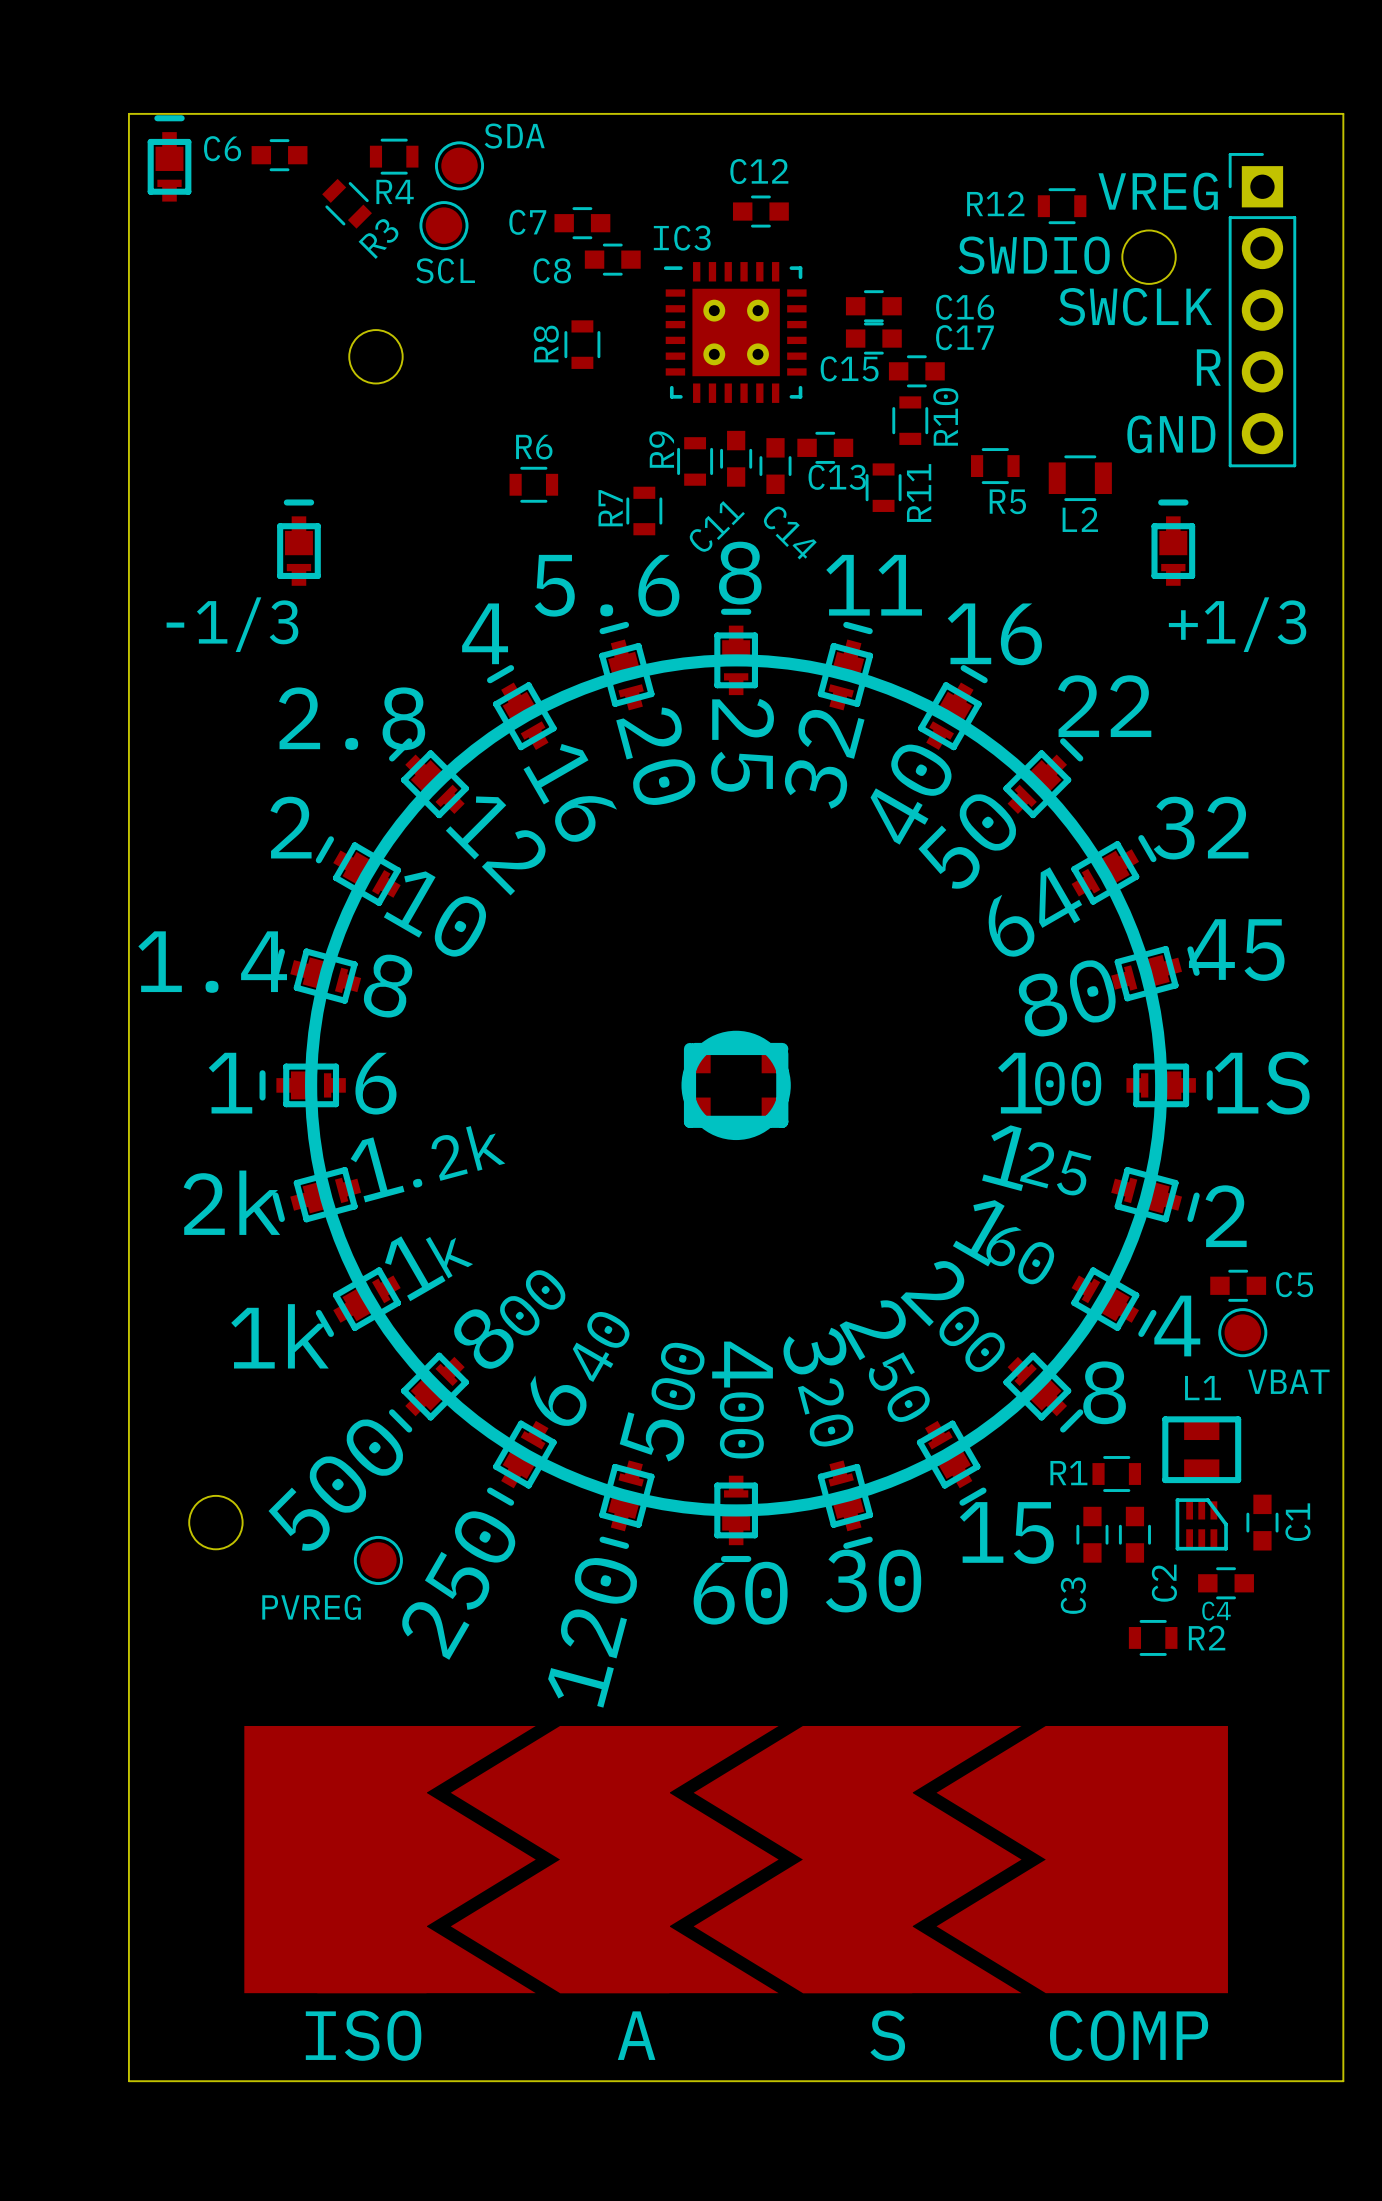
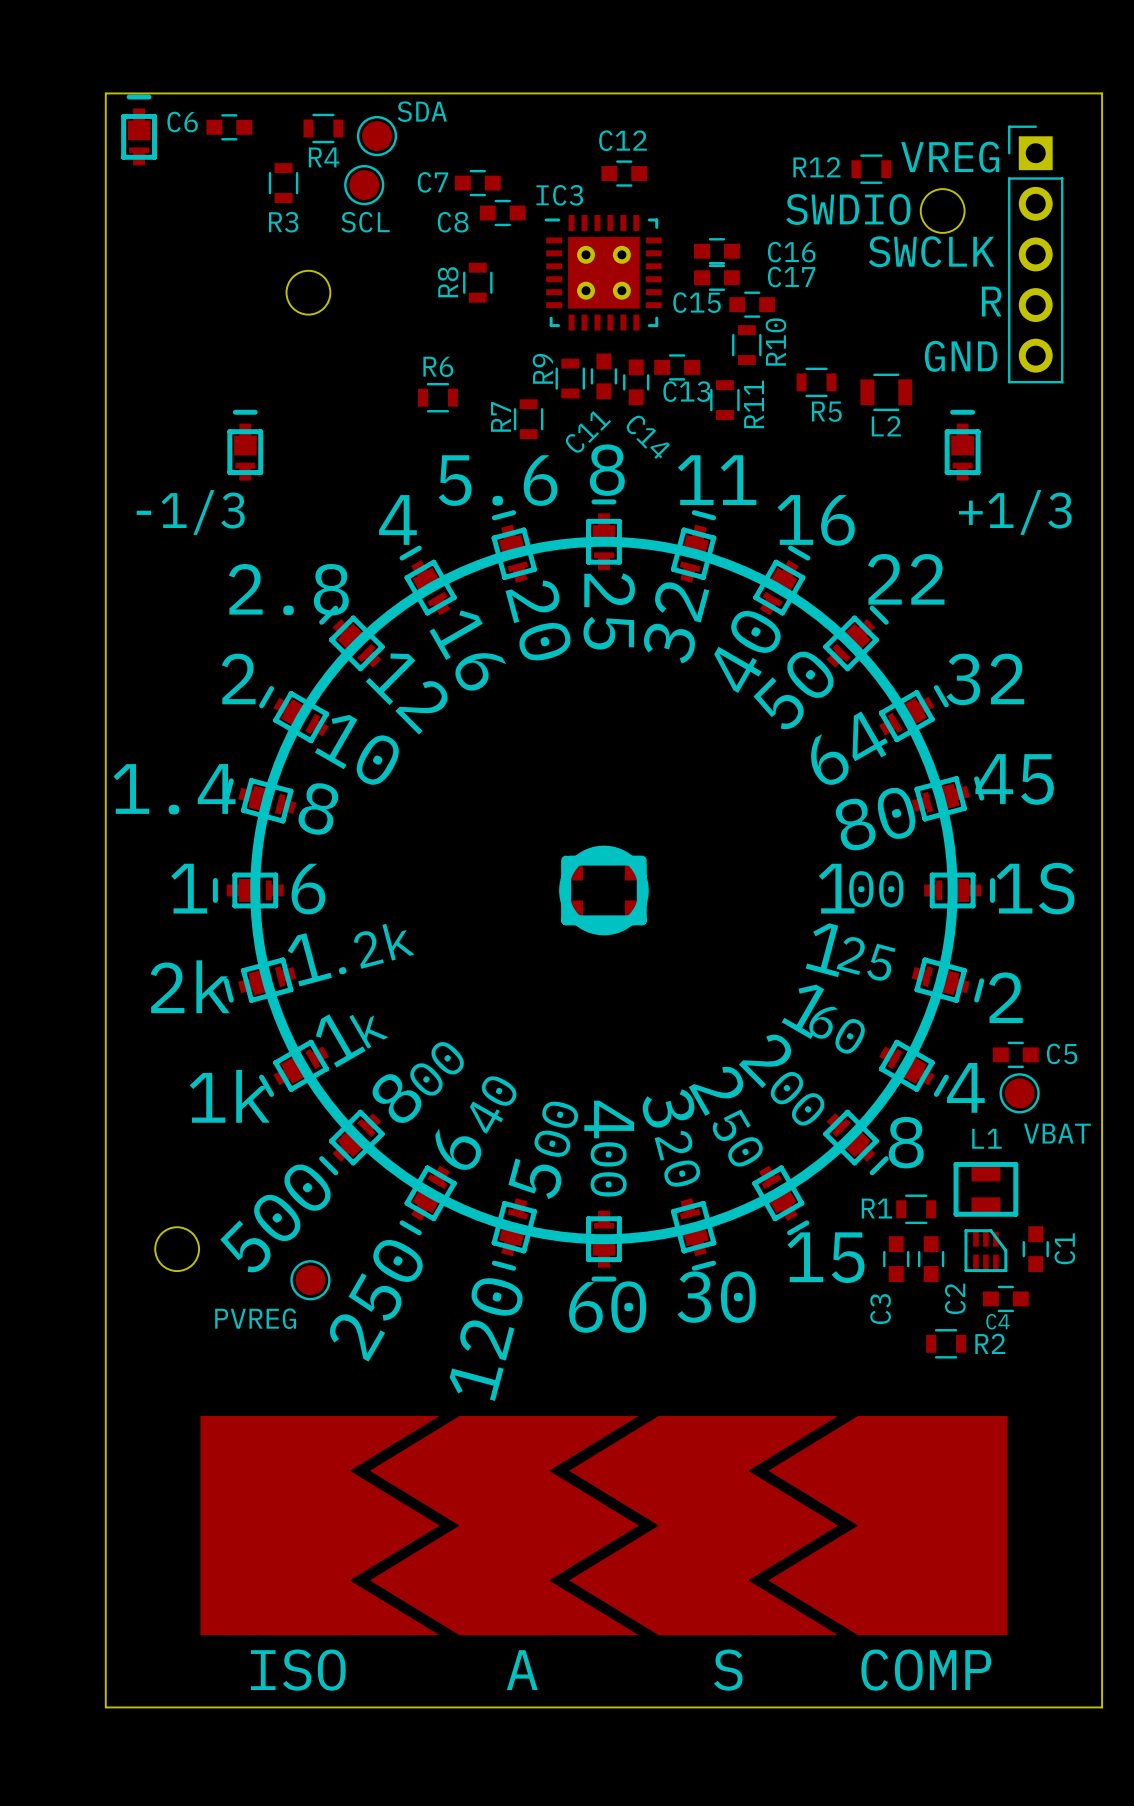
R3 rotation: 0° (347, 203) -> 45° clockwise (283, 183)

